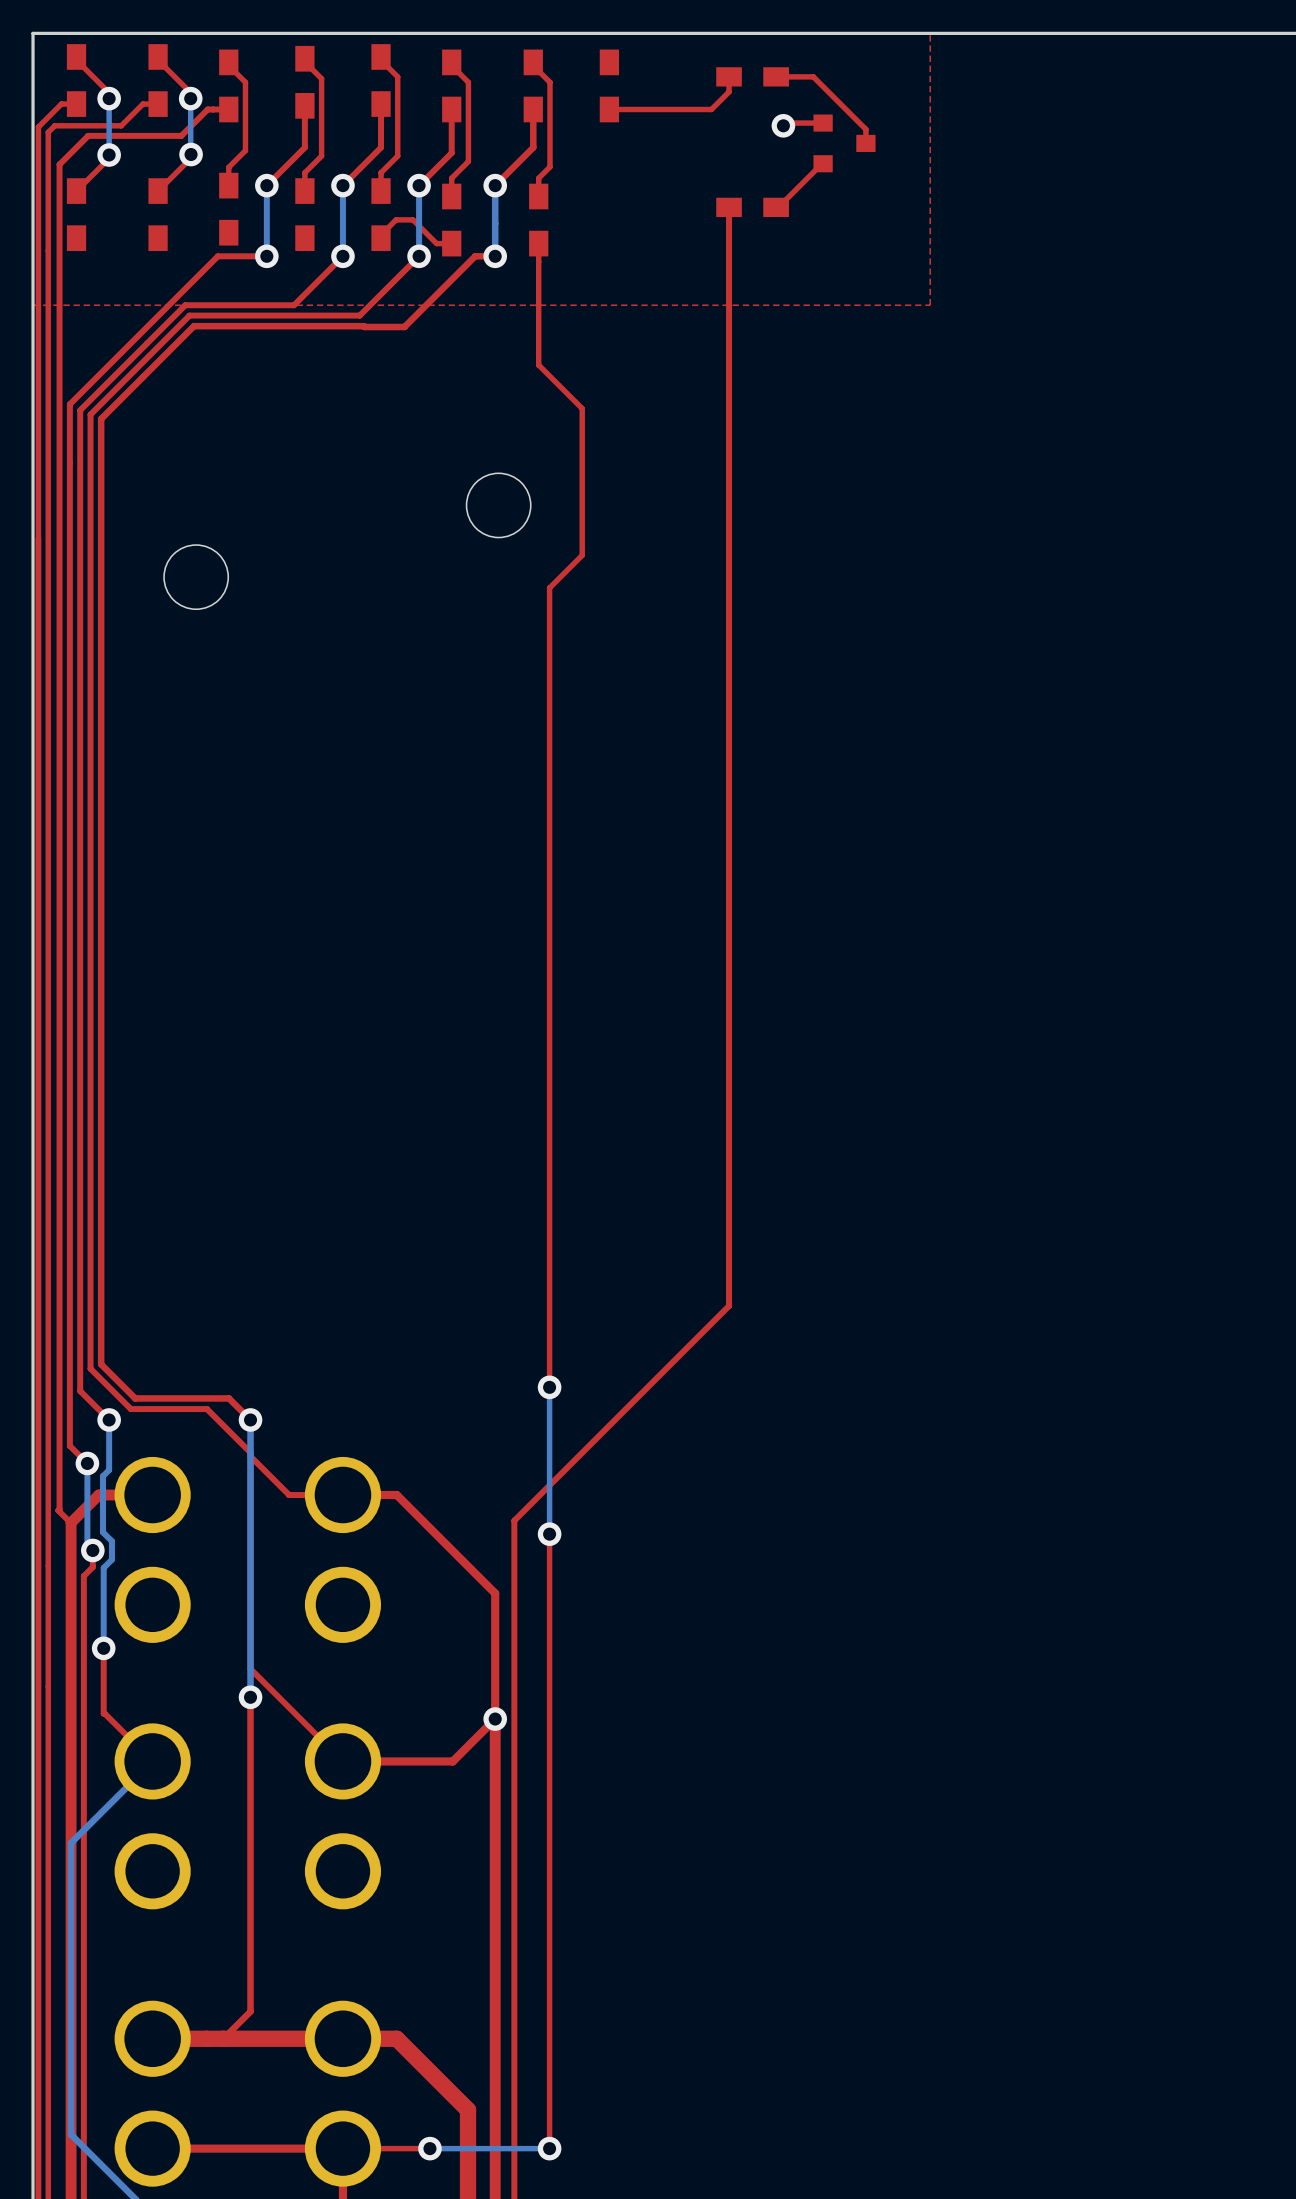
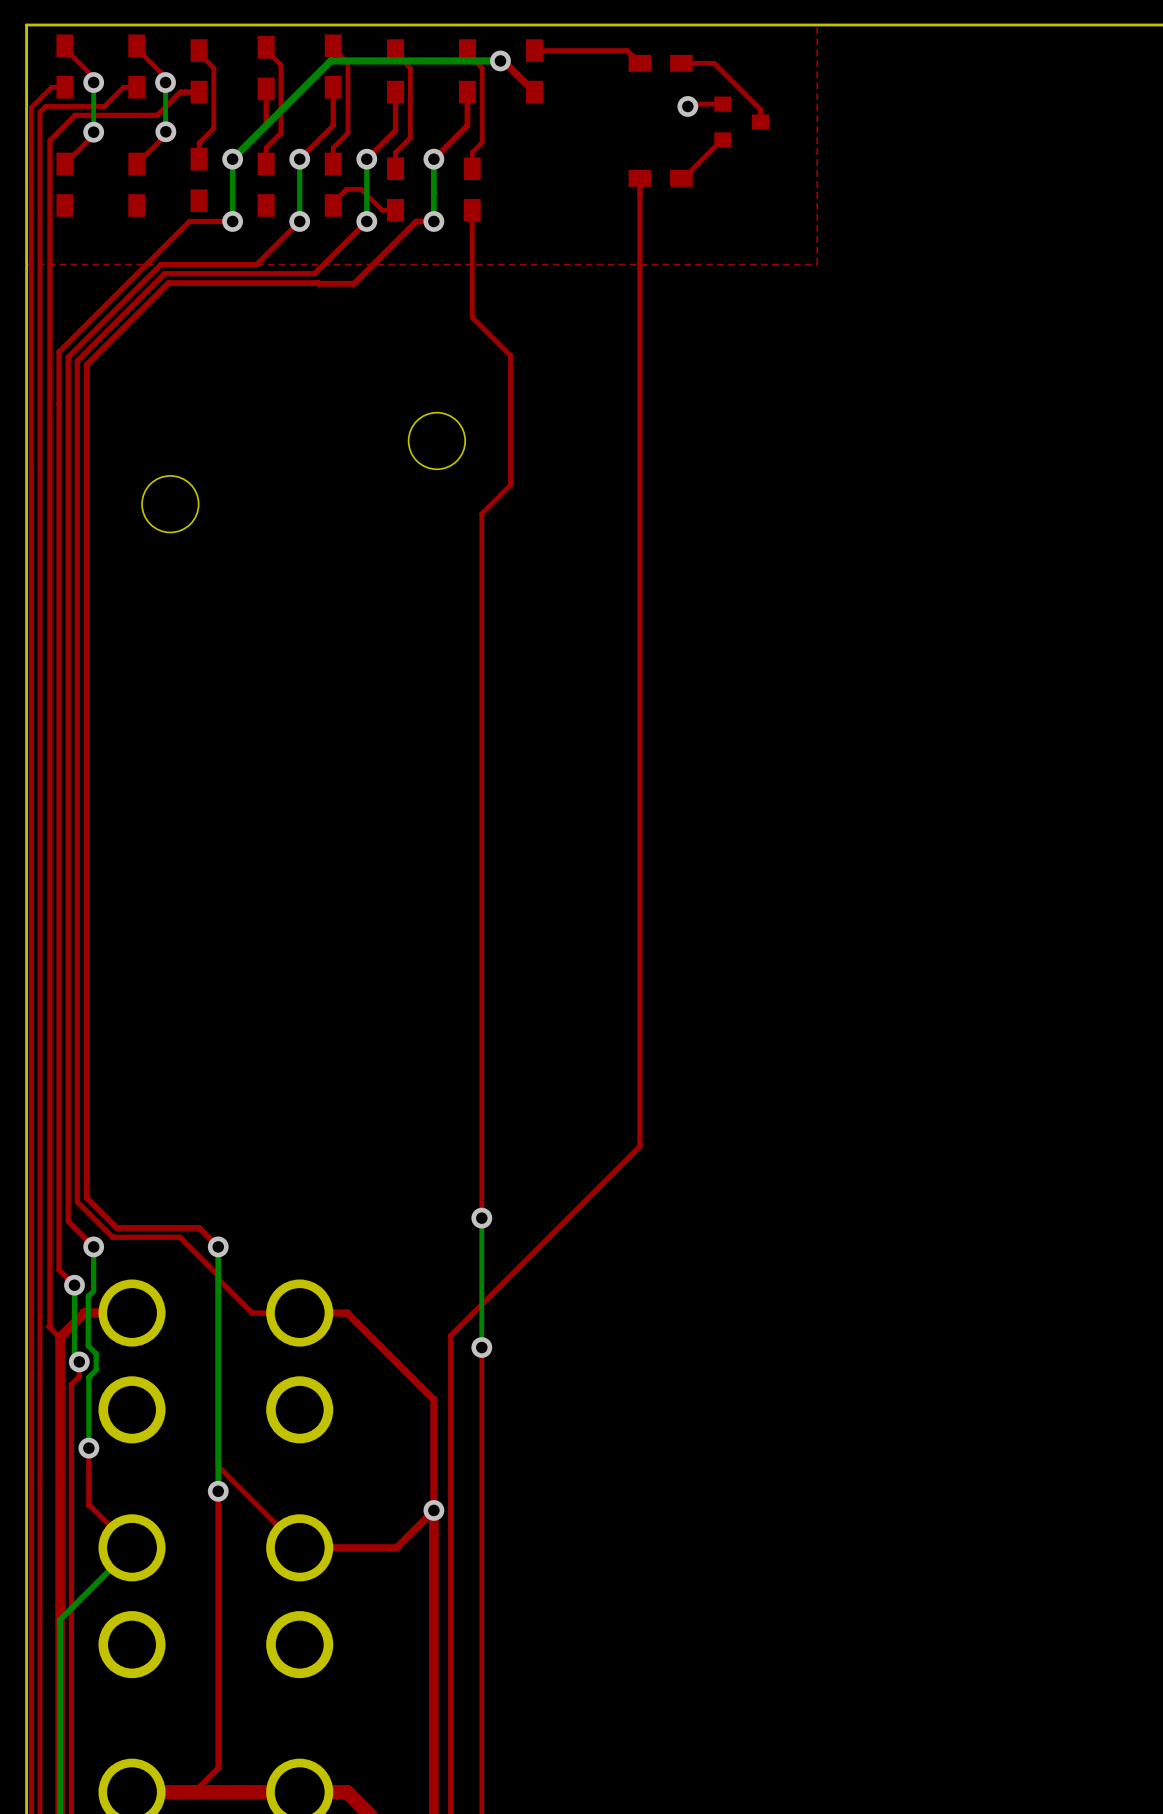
bottom track: none -> (500, 60) (330, 60) (232, 159)
top track: none -> (500, 60) (503, 60) (534, 92)
via: none -> (500, 60)
top track: (729, 76) (729, 91) (711, 109) (609, 109) -> (639, 63) (627, 50) (534, 50)

